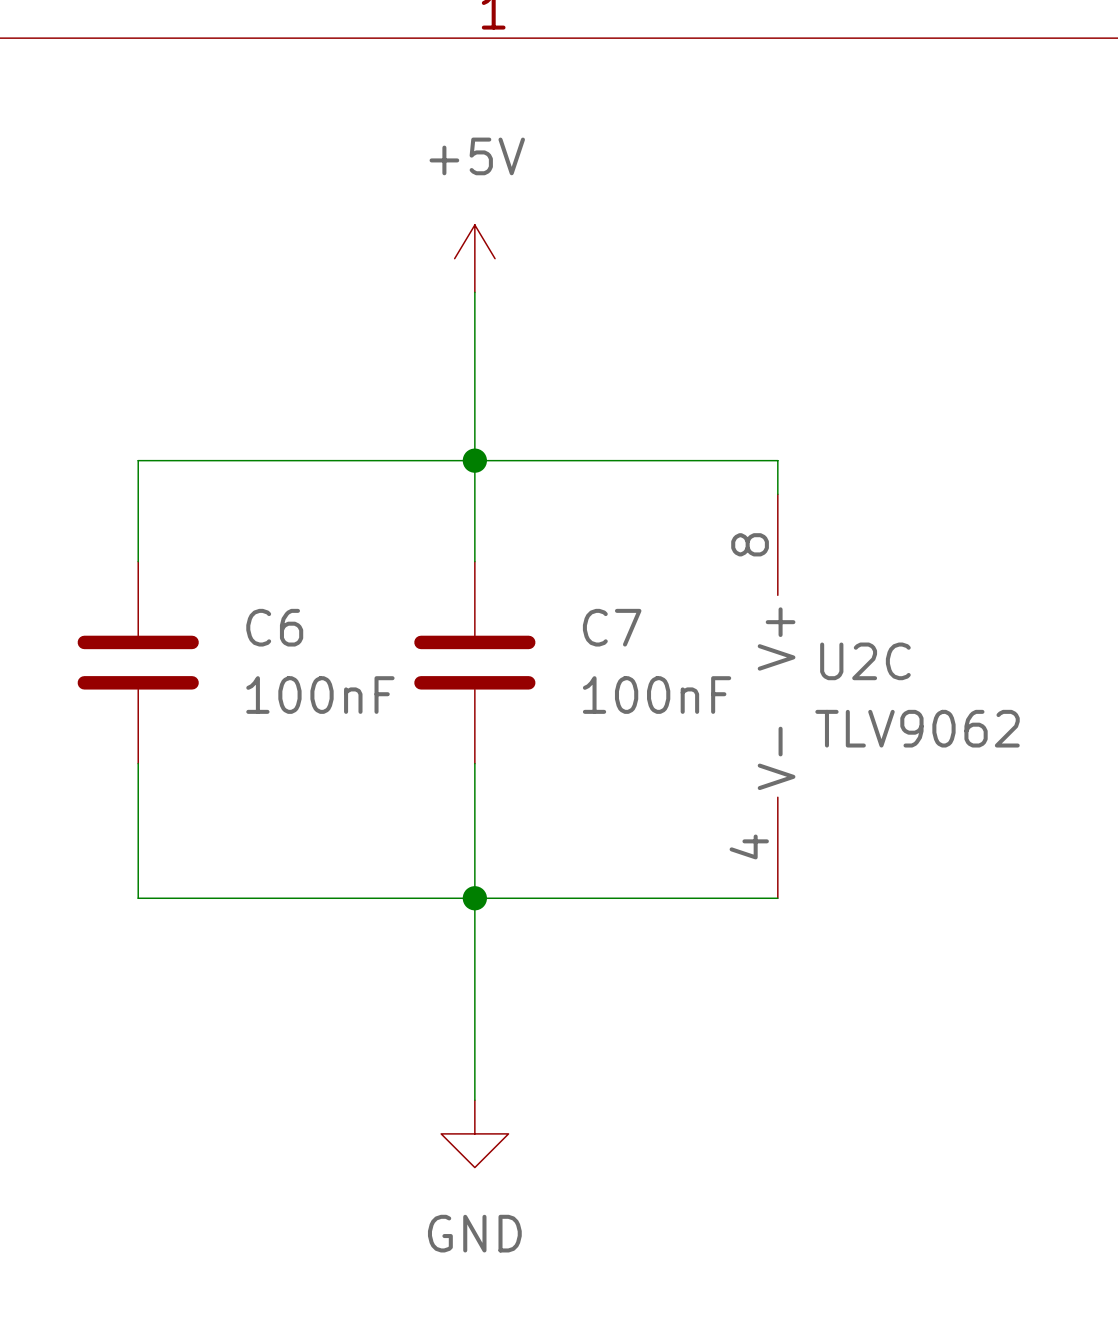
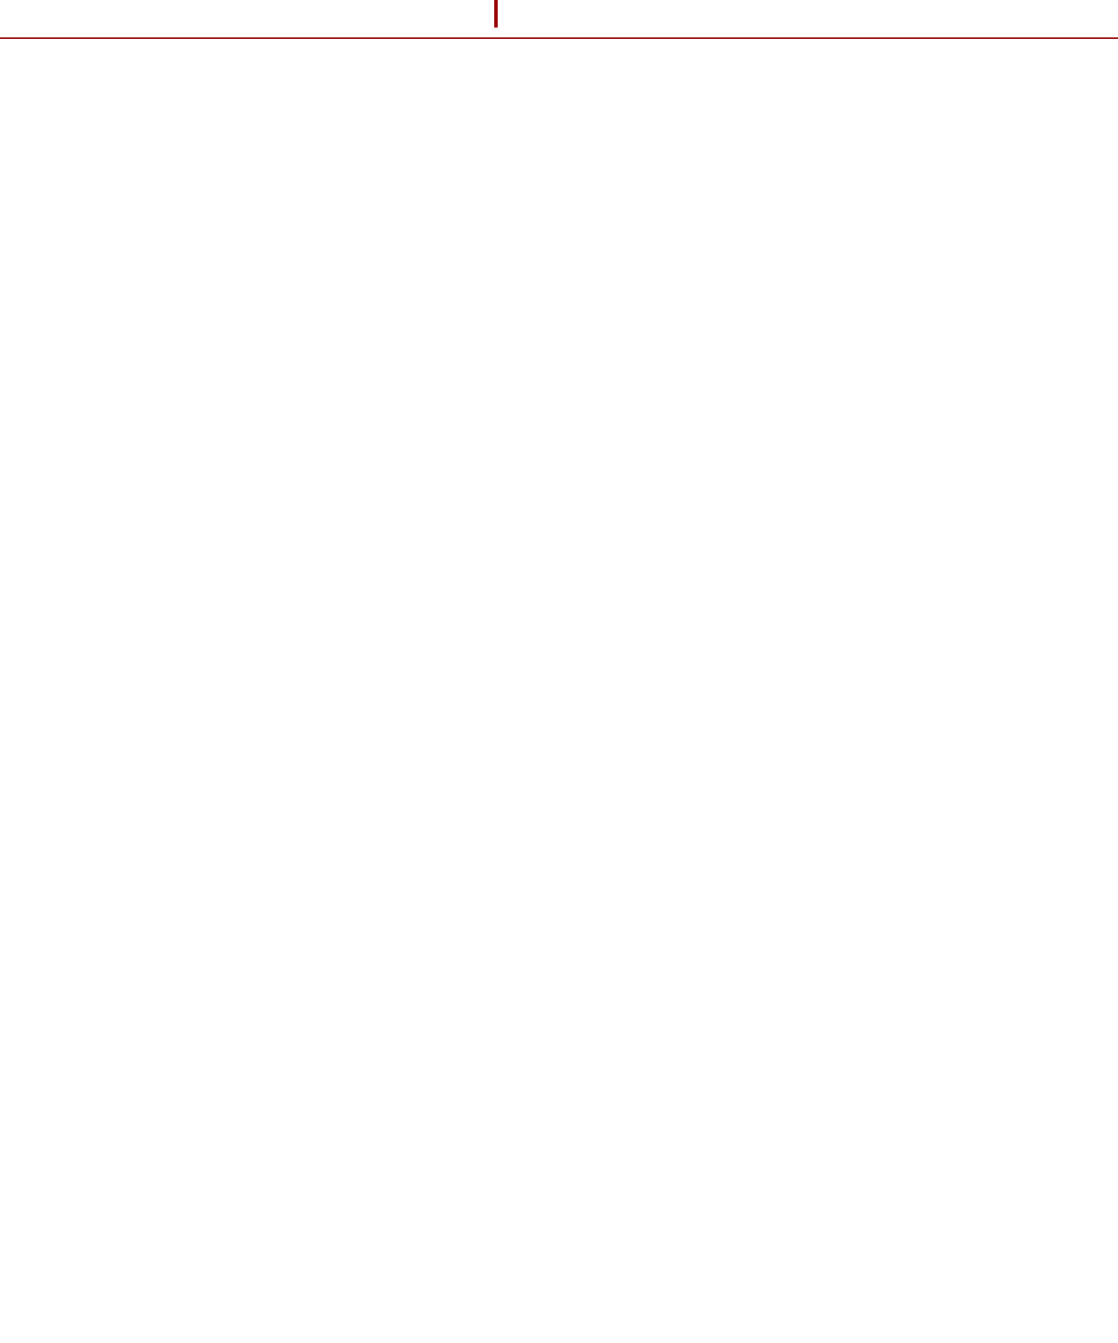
power symbol: +5V (474, 258) -> none
wire: (474, 292) (474, 561) -> none
junction: (474, 460) -> none
wire: (777, 494) (777, 460) (138, 460) (138, 561) -> none
C6: 100nF (138, 662) -> none
C7: 100nF (474, 662) -> none
U2C: TLV9062 (777, 696) -> none
wire: (138, 763) (138, 898) (777, 898) -> none
wire: (474, 763) (474, 1100) -> none
junction: (474, 898) -> none
power symbol: GND (474, 1133) -> none

